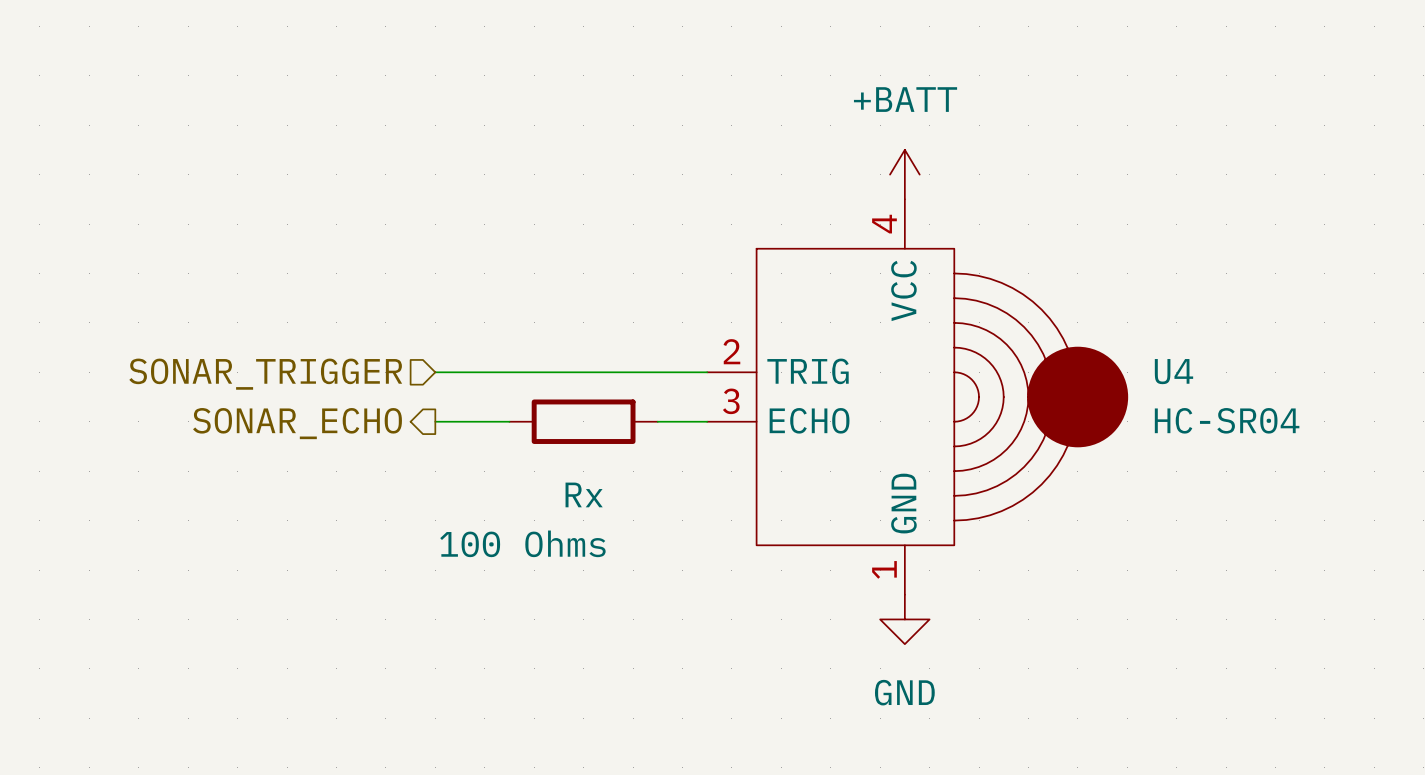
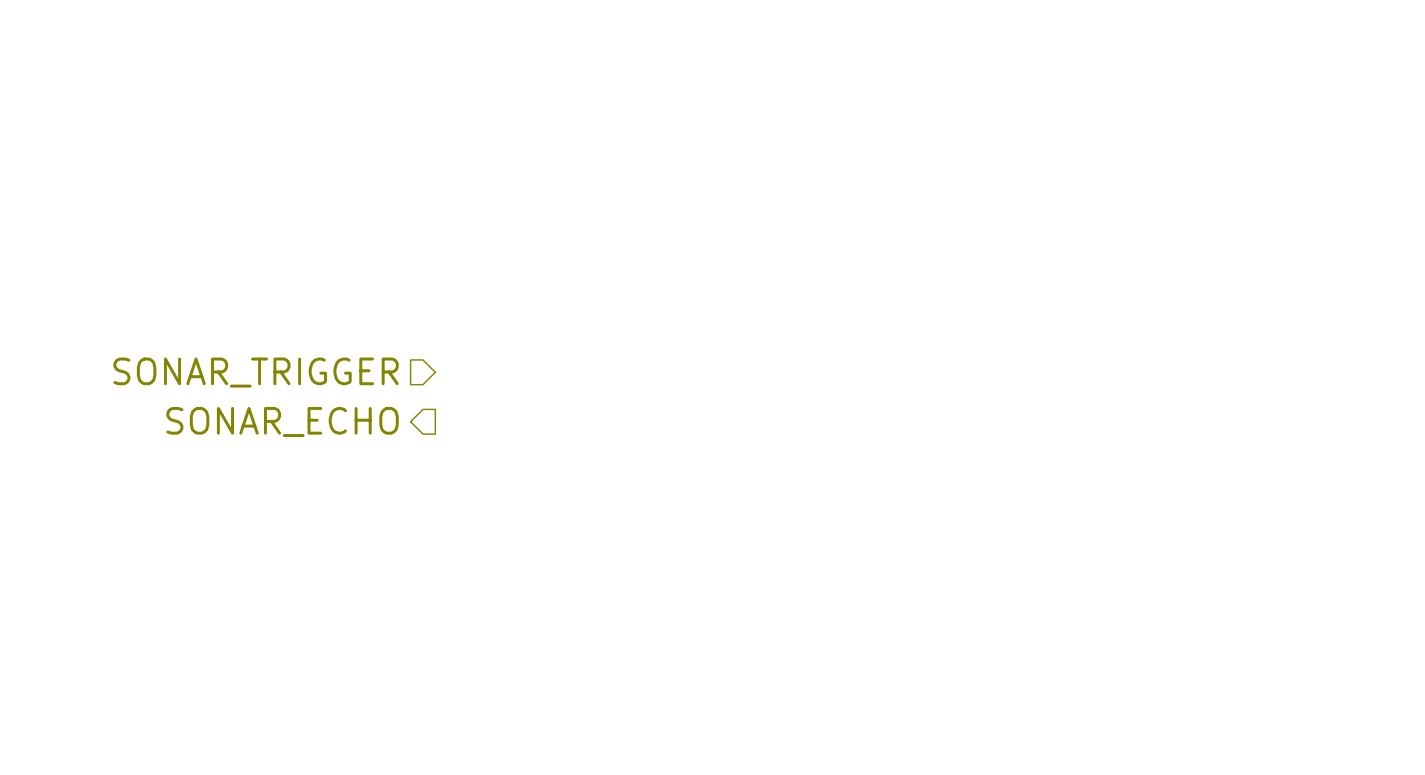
power symbol: +BATT (904, 174) -> none
wire: (435, 372) (707, 372) -> none
U4: HC-SR04 (917, 397) -> none
wire: (435, 421) (509, 421) -> none
Rx: 100 Ohms (583, 421) -> none
wire: (657, 421) (707, 421) -> none
power symbol: GND (904, 619) -> none

